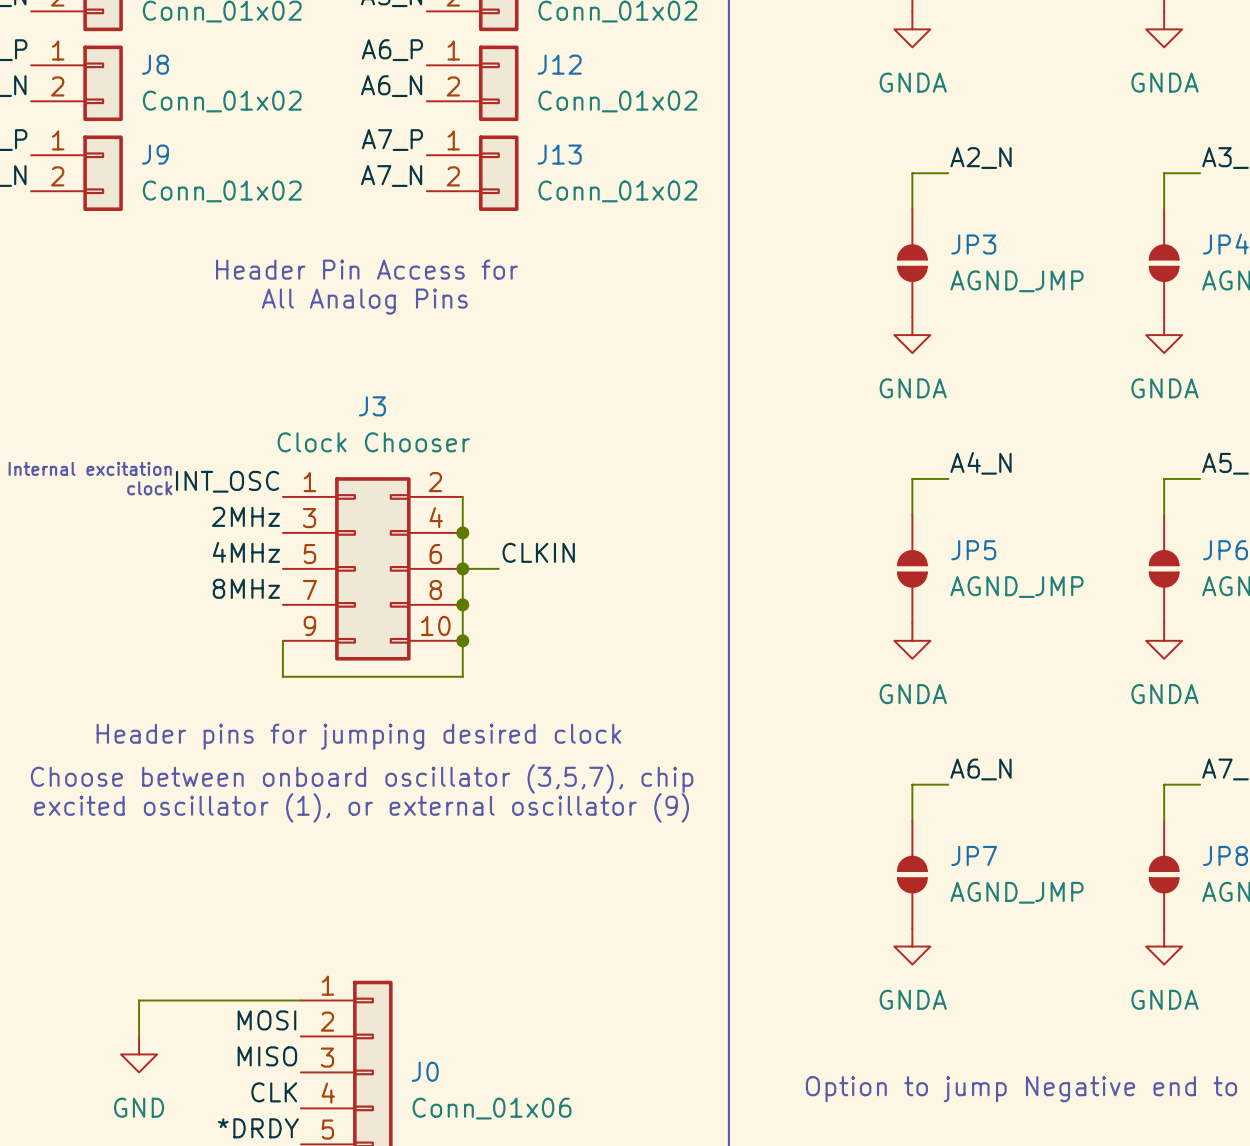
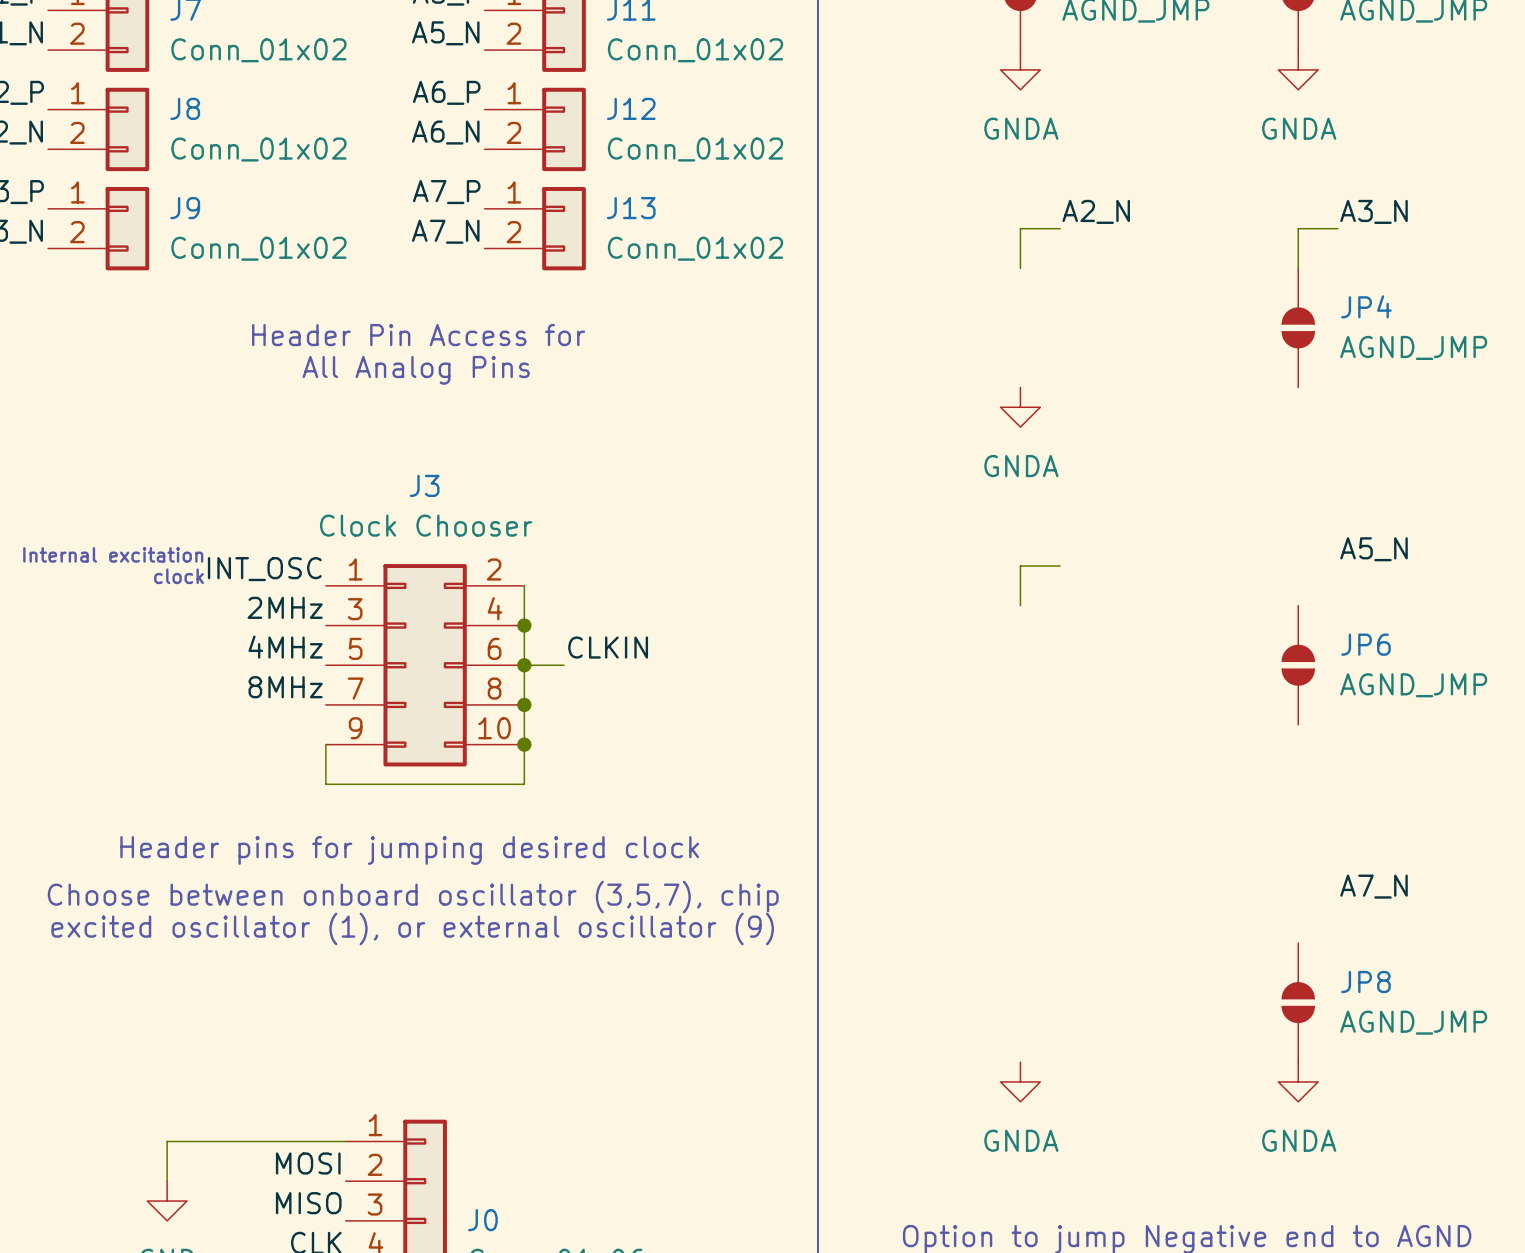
JP3: AGND_JMP (912, 263) -> none
power symbol: GNDA (1164, 335) -> none
label: A4_N (981, 463) -> none
wire: (1200, 478) (1164, 478) (1164, 514) -> none
JP5: AGND_JMP (912, 568) -> none
power symbol: GNDA (912, 640) -> none
power symbol: GNDA (1164, 640) -> none
label: A6_N (981, 769) -> none
wire: (948, 784) (912, 784) (912, 820) -> none
wire: (1200, 784) (1164, 784) (1164, 820) -> none
JP7: AGND_JMP (912, 874) -> none

